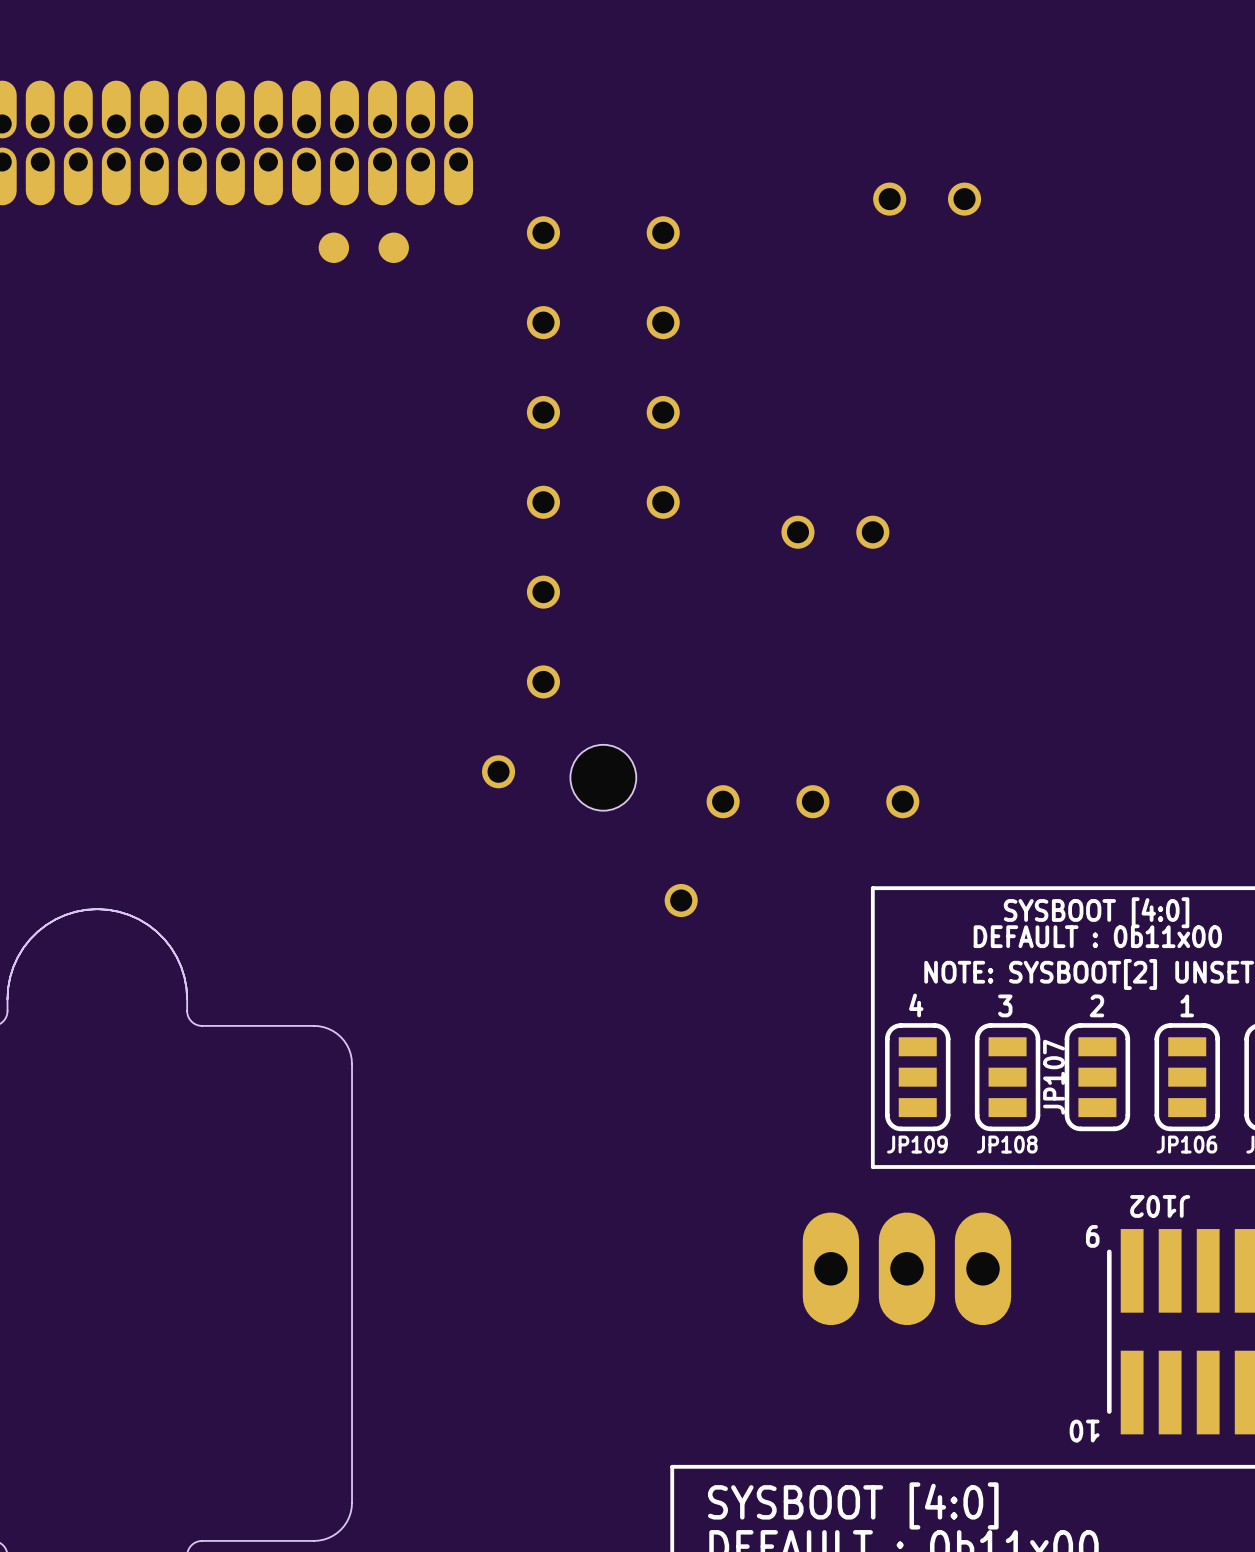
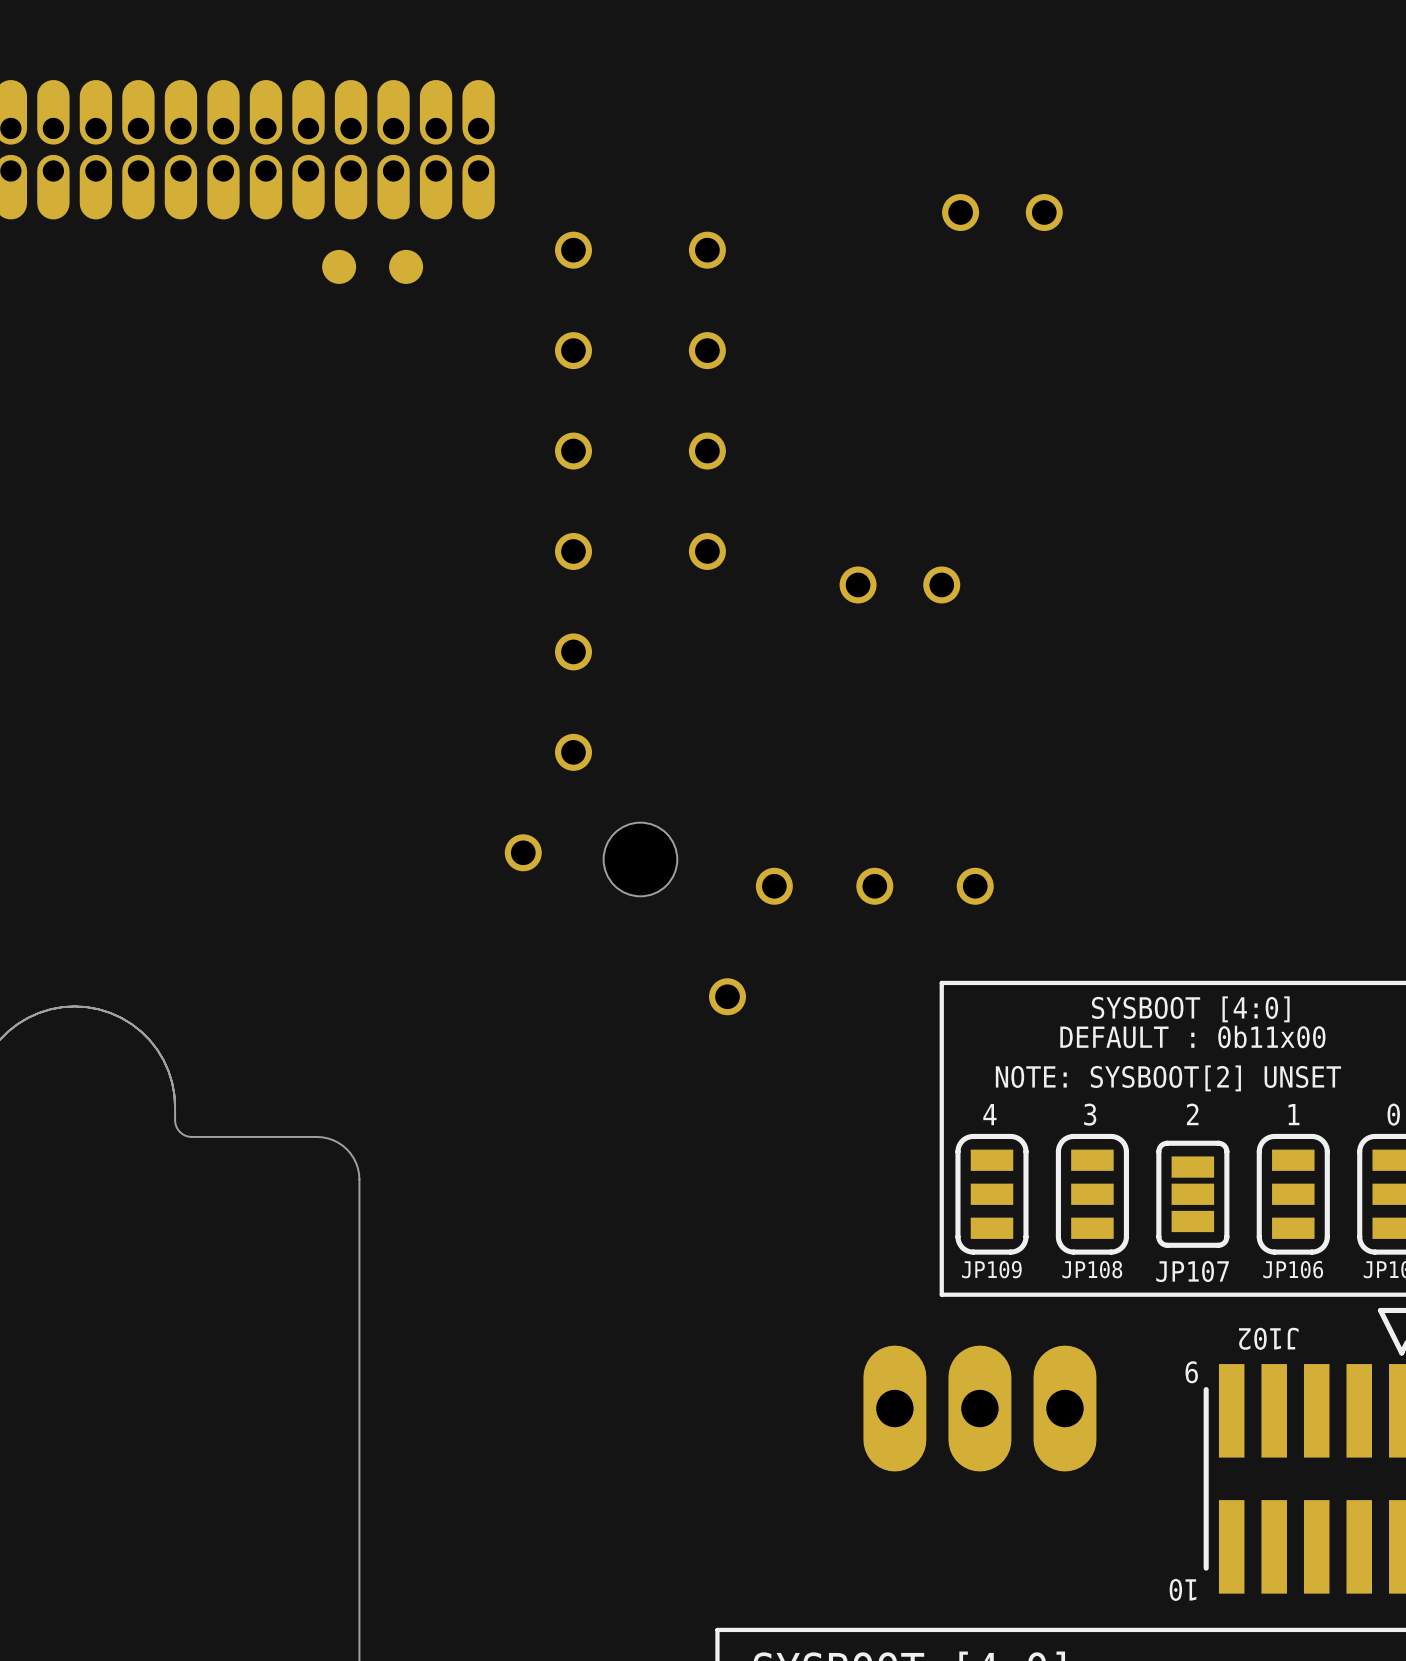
JP107 footprint: [1064, 1023, 1131, 1132] -> [1156, 1140, 1230, 1248]
JP107 name rotation: 0° (1054, 1077) -> 90° clockwise (1192, 1271)

